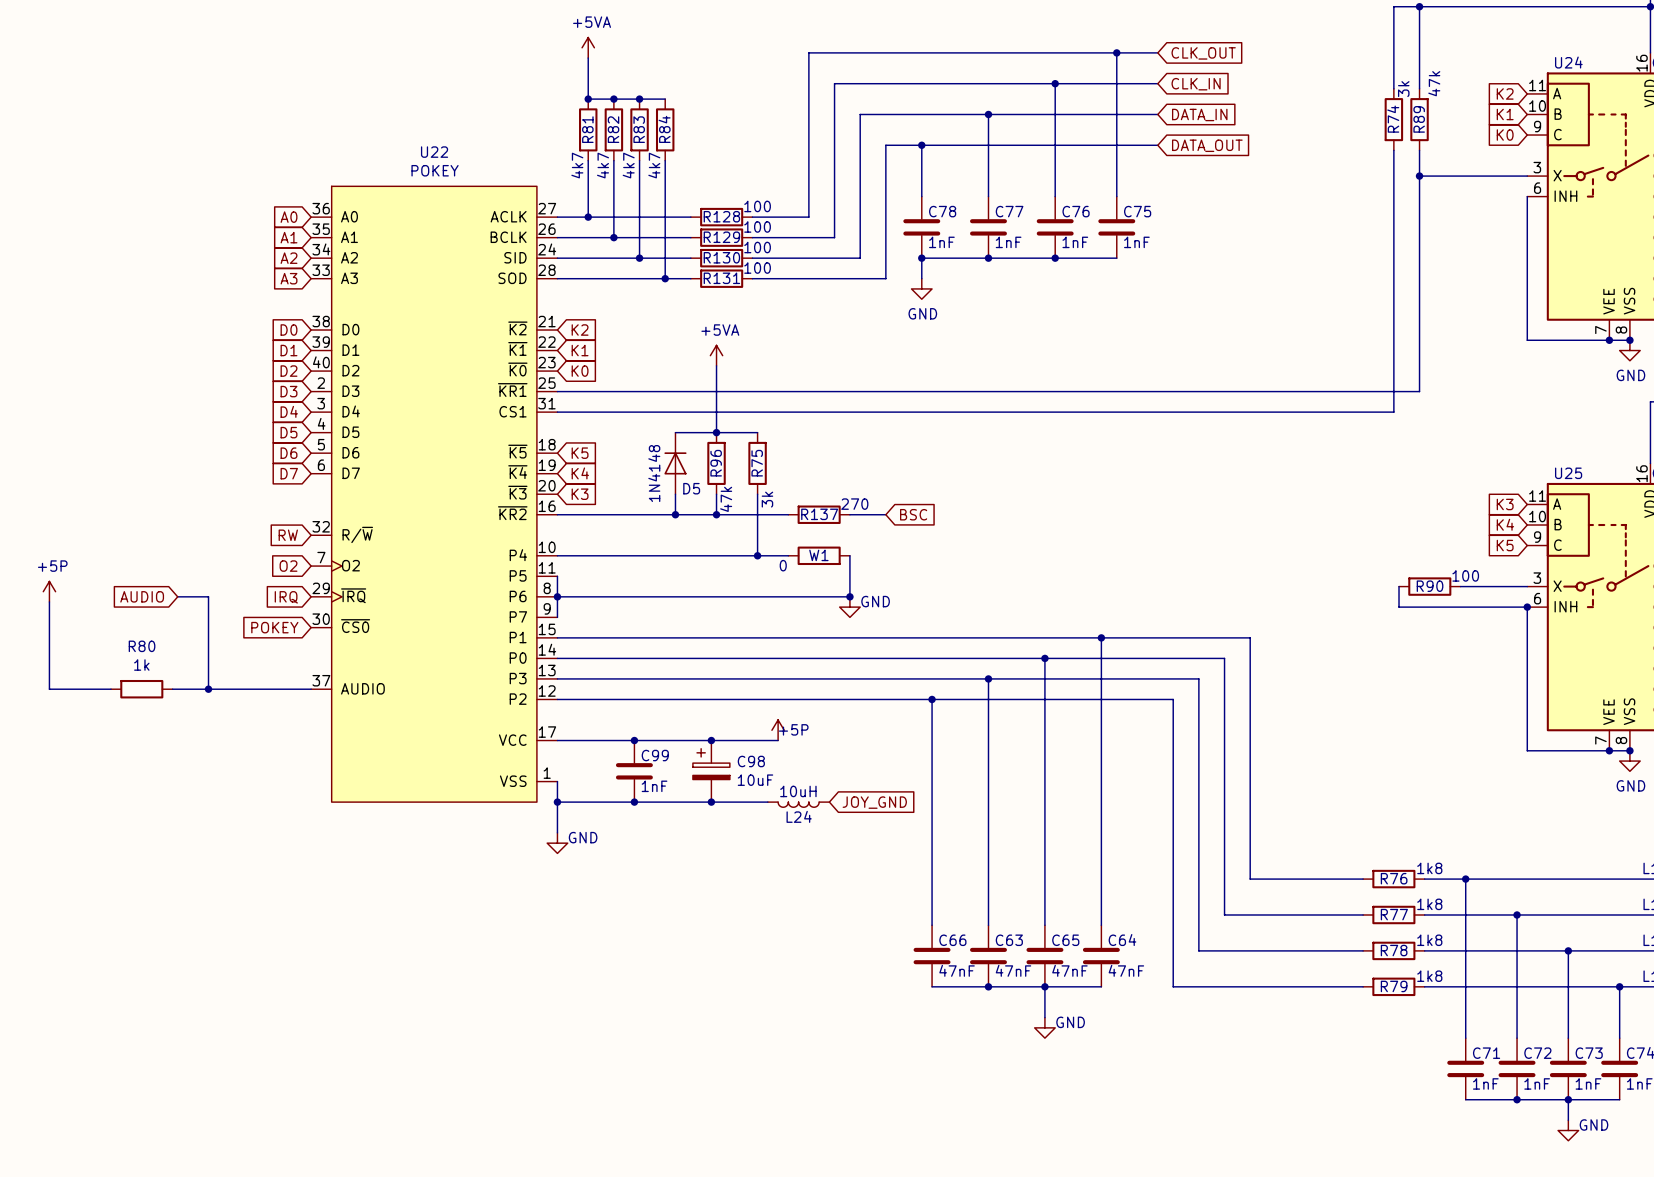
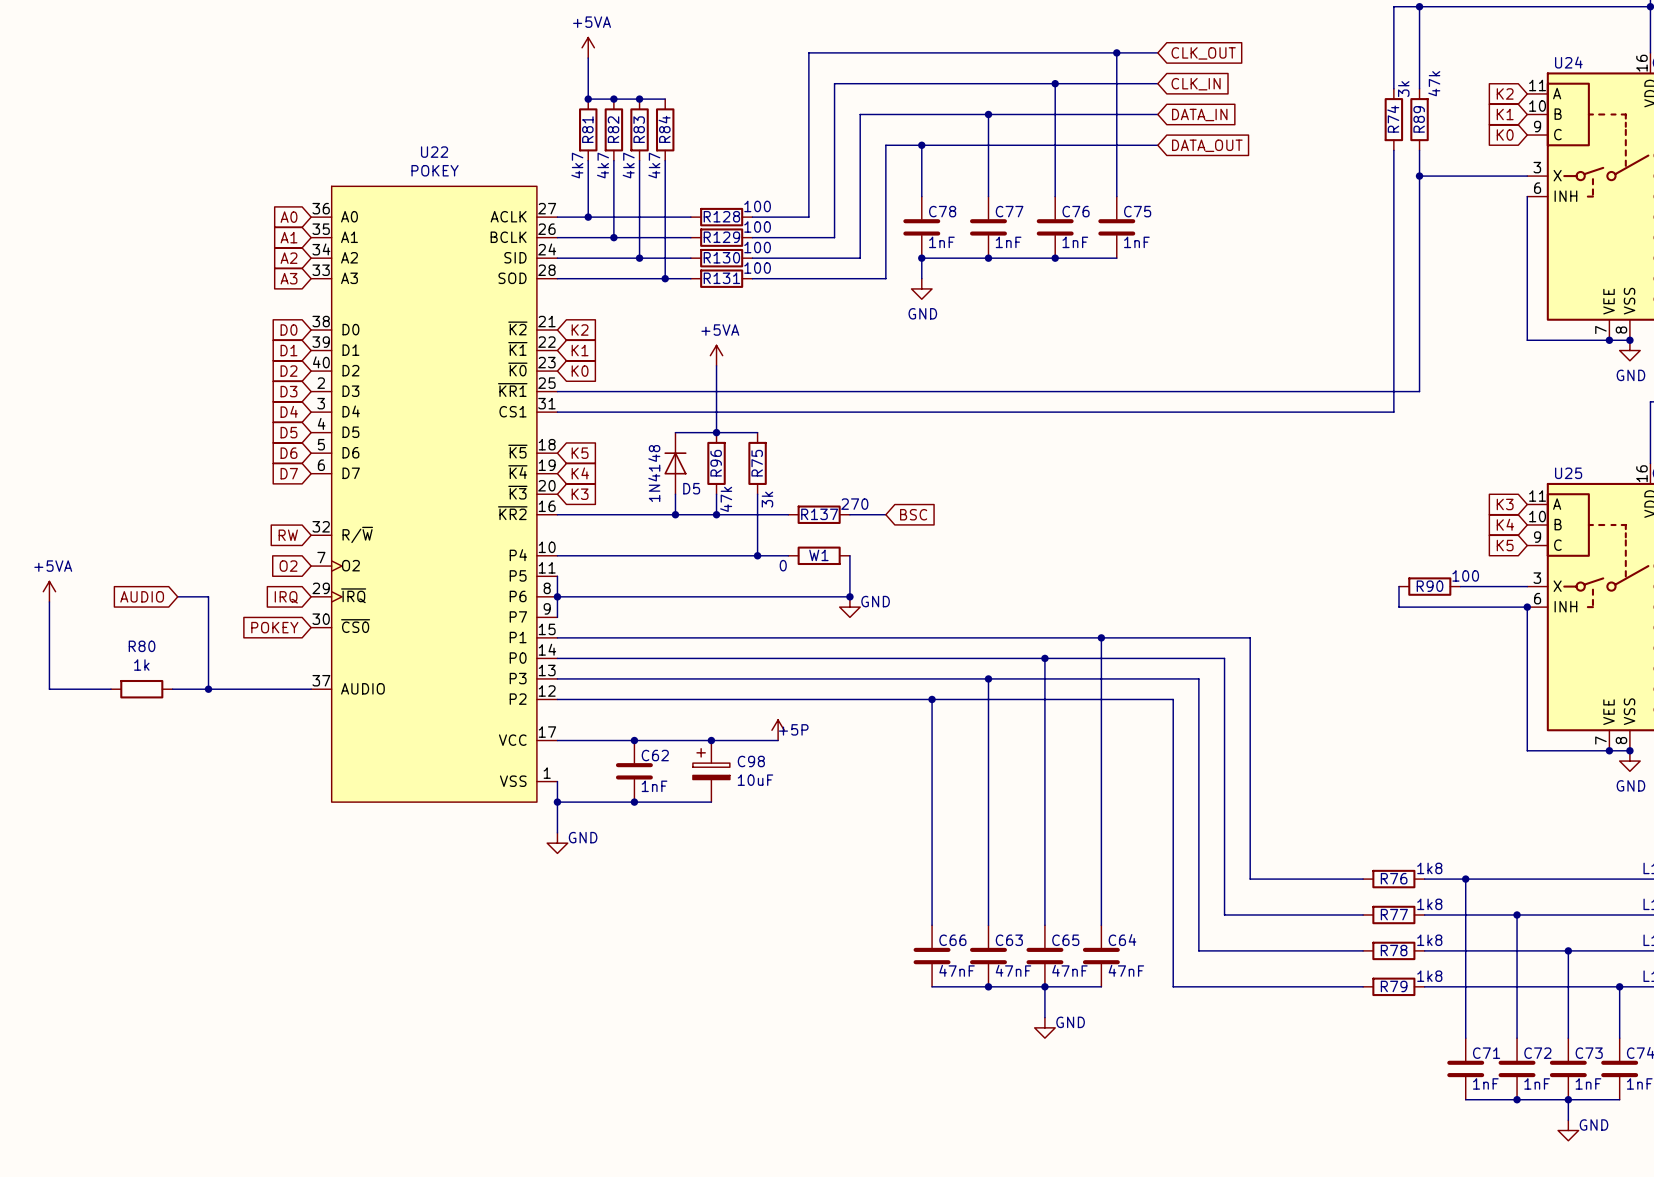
power symbol: +5P (49, 591) -> +5VA (49, 591)
C99 name: C99 (655, 755) -> C62 (655, 755)
wire: (711, 802) (767, 802) -> none
junction: (711, 802) -> none
global label: JOY_GND (874, 802) -> none
L24: 10uH (798, 804) -> none

